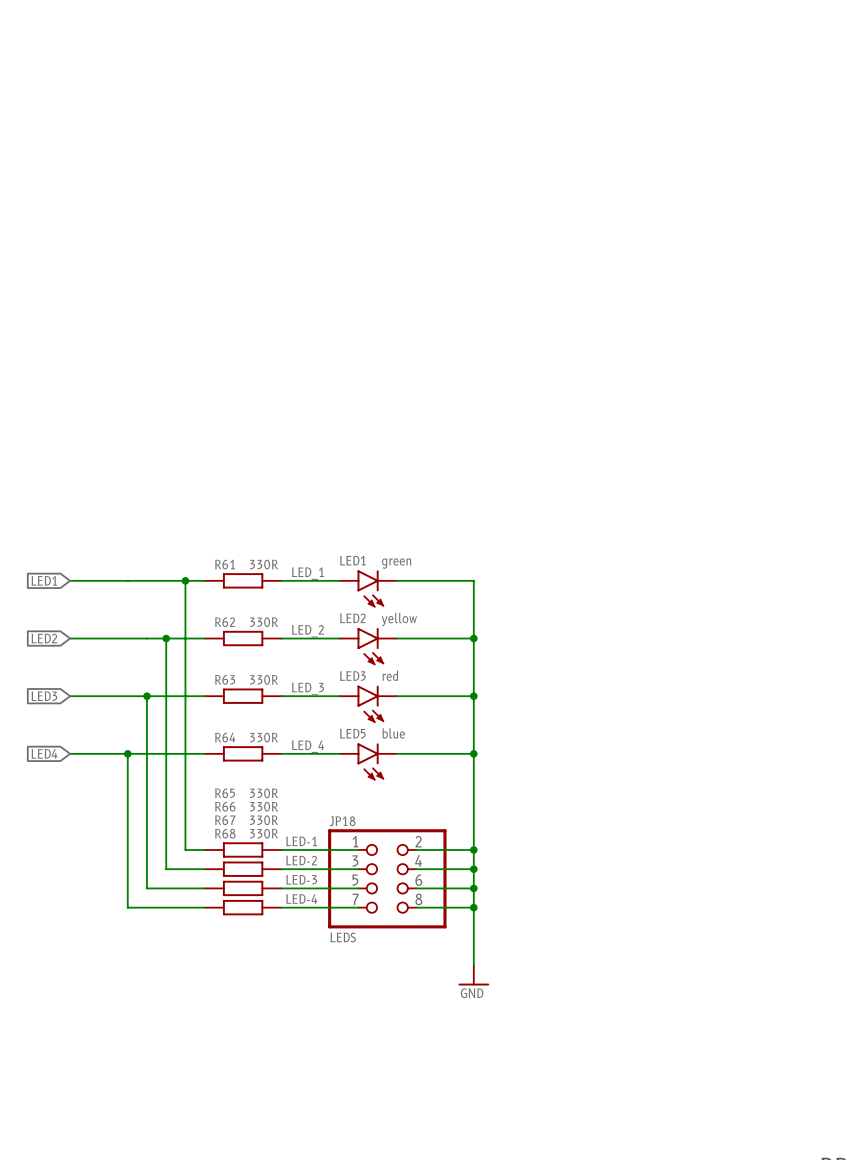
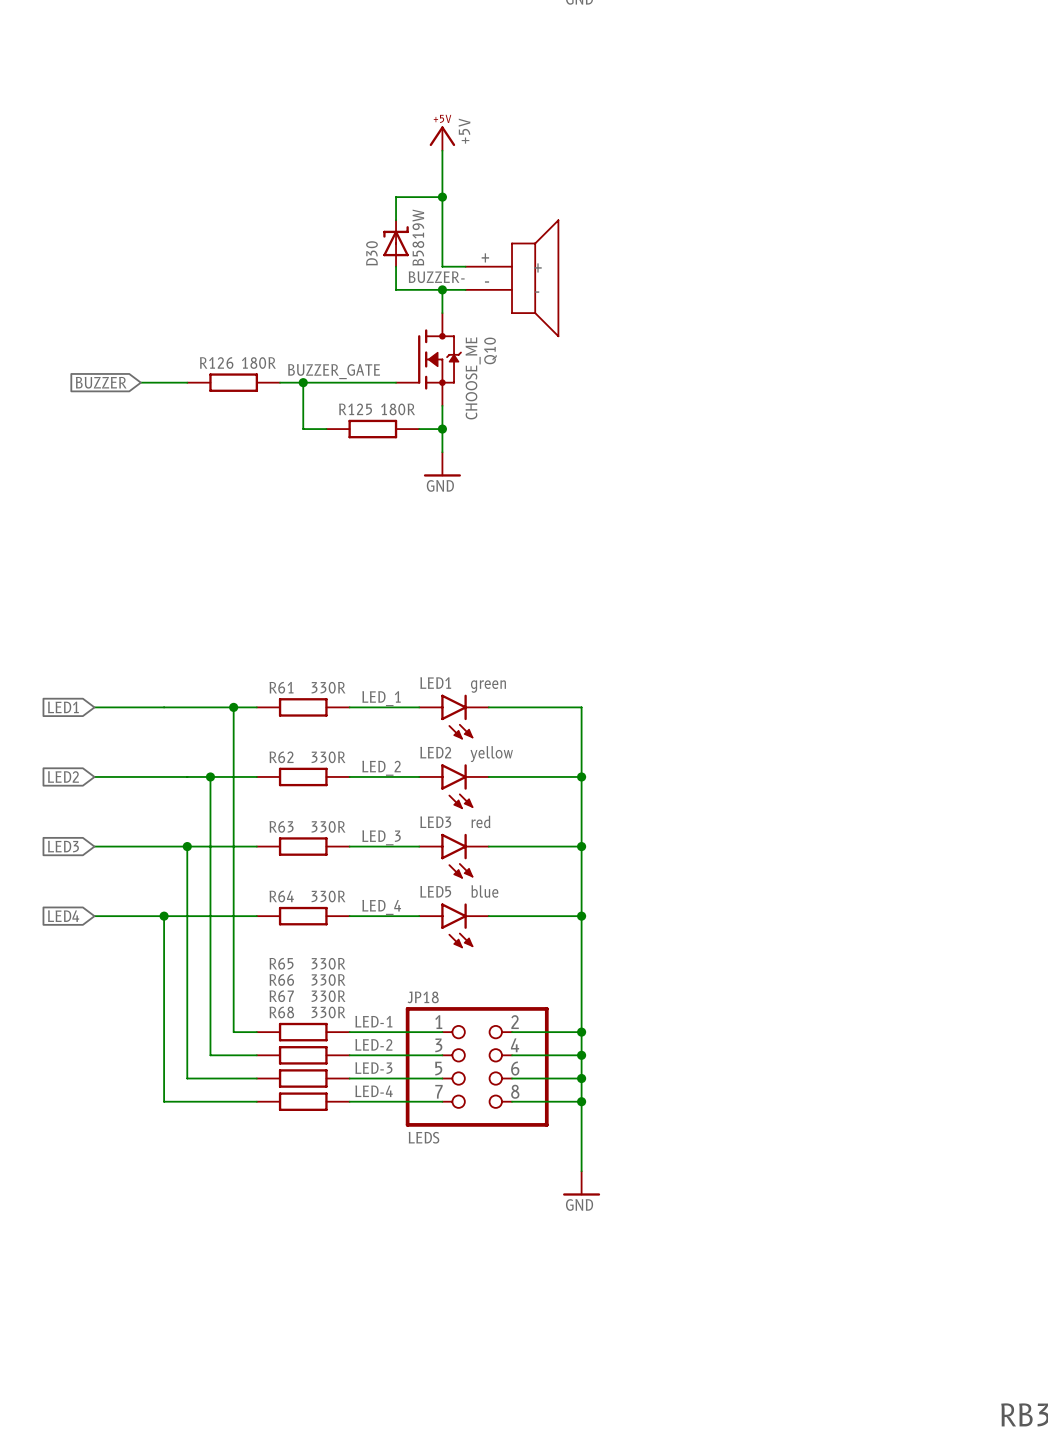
power symbol: none -> +5V (442, 138)
wire: none -> (442, 150) (442, 266) (465, 266)
wire: none -> (442, 197) (396, 197) (396, 220)
junction: none -> (442, 197)
D30: none -> B5819W (396, 243)
wire: none -> (396, 266) (396, 289) (465, 289)
label: none -> BUZZER- (436, 277)
part: none -> (512, 278)
wire: none -> (442, 289) (442, 313)
junction: none -> (442, 289)
Q10: none -> CHOOSE_ME (428, 359)
label: none -> BUZZER_GATE (334, 371)
global label: none -> BUZZER (101, 382)
wire: none -> (140, 382) (187, 382)
R126: none -> 180R (233, 382)
wire: none -> (280, 382) (396, 382)
wire: none -> (303, 382) (303, 429) (326, 429)
junction: none -> (303, 382)
wire: none -> (442, 405) (442, 452)
R125: none -> 180R (372, 429)
wire: none -> (419, 429) (442, 429)
junction: none -> (442, 429)
power symbol: none -> GND (442, 464)

